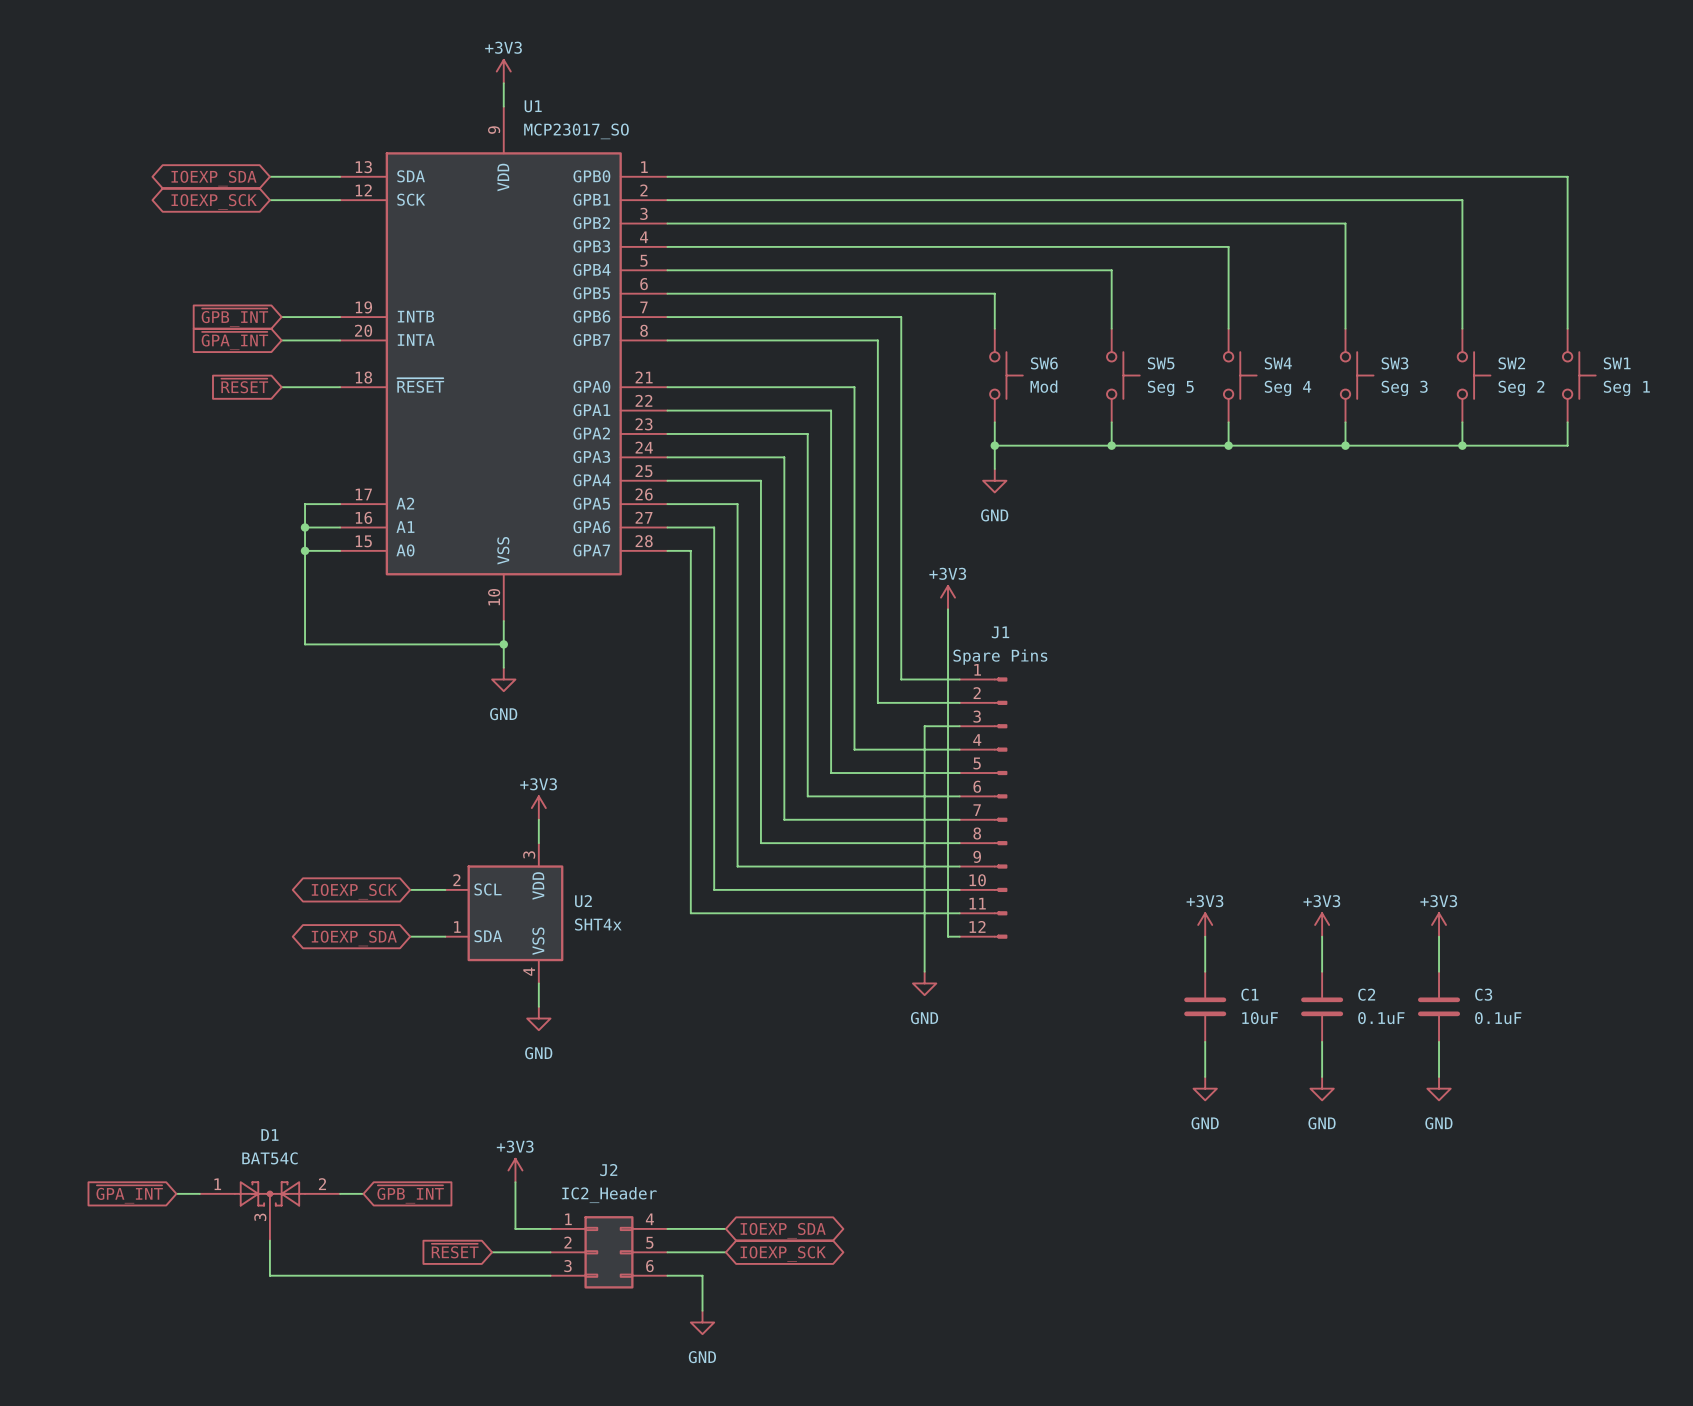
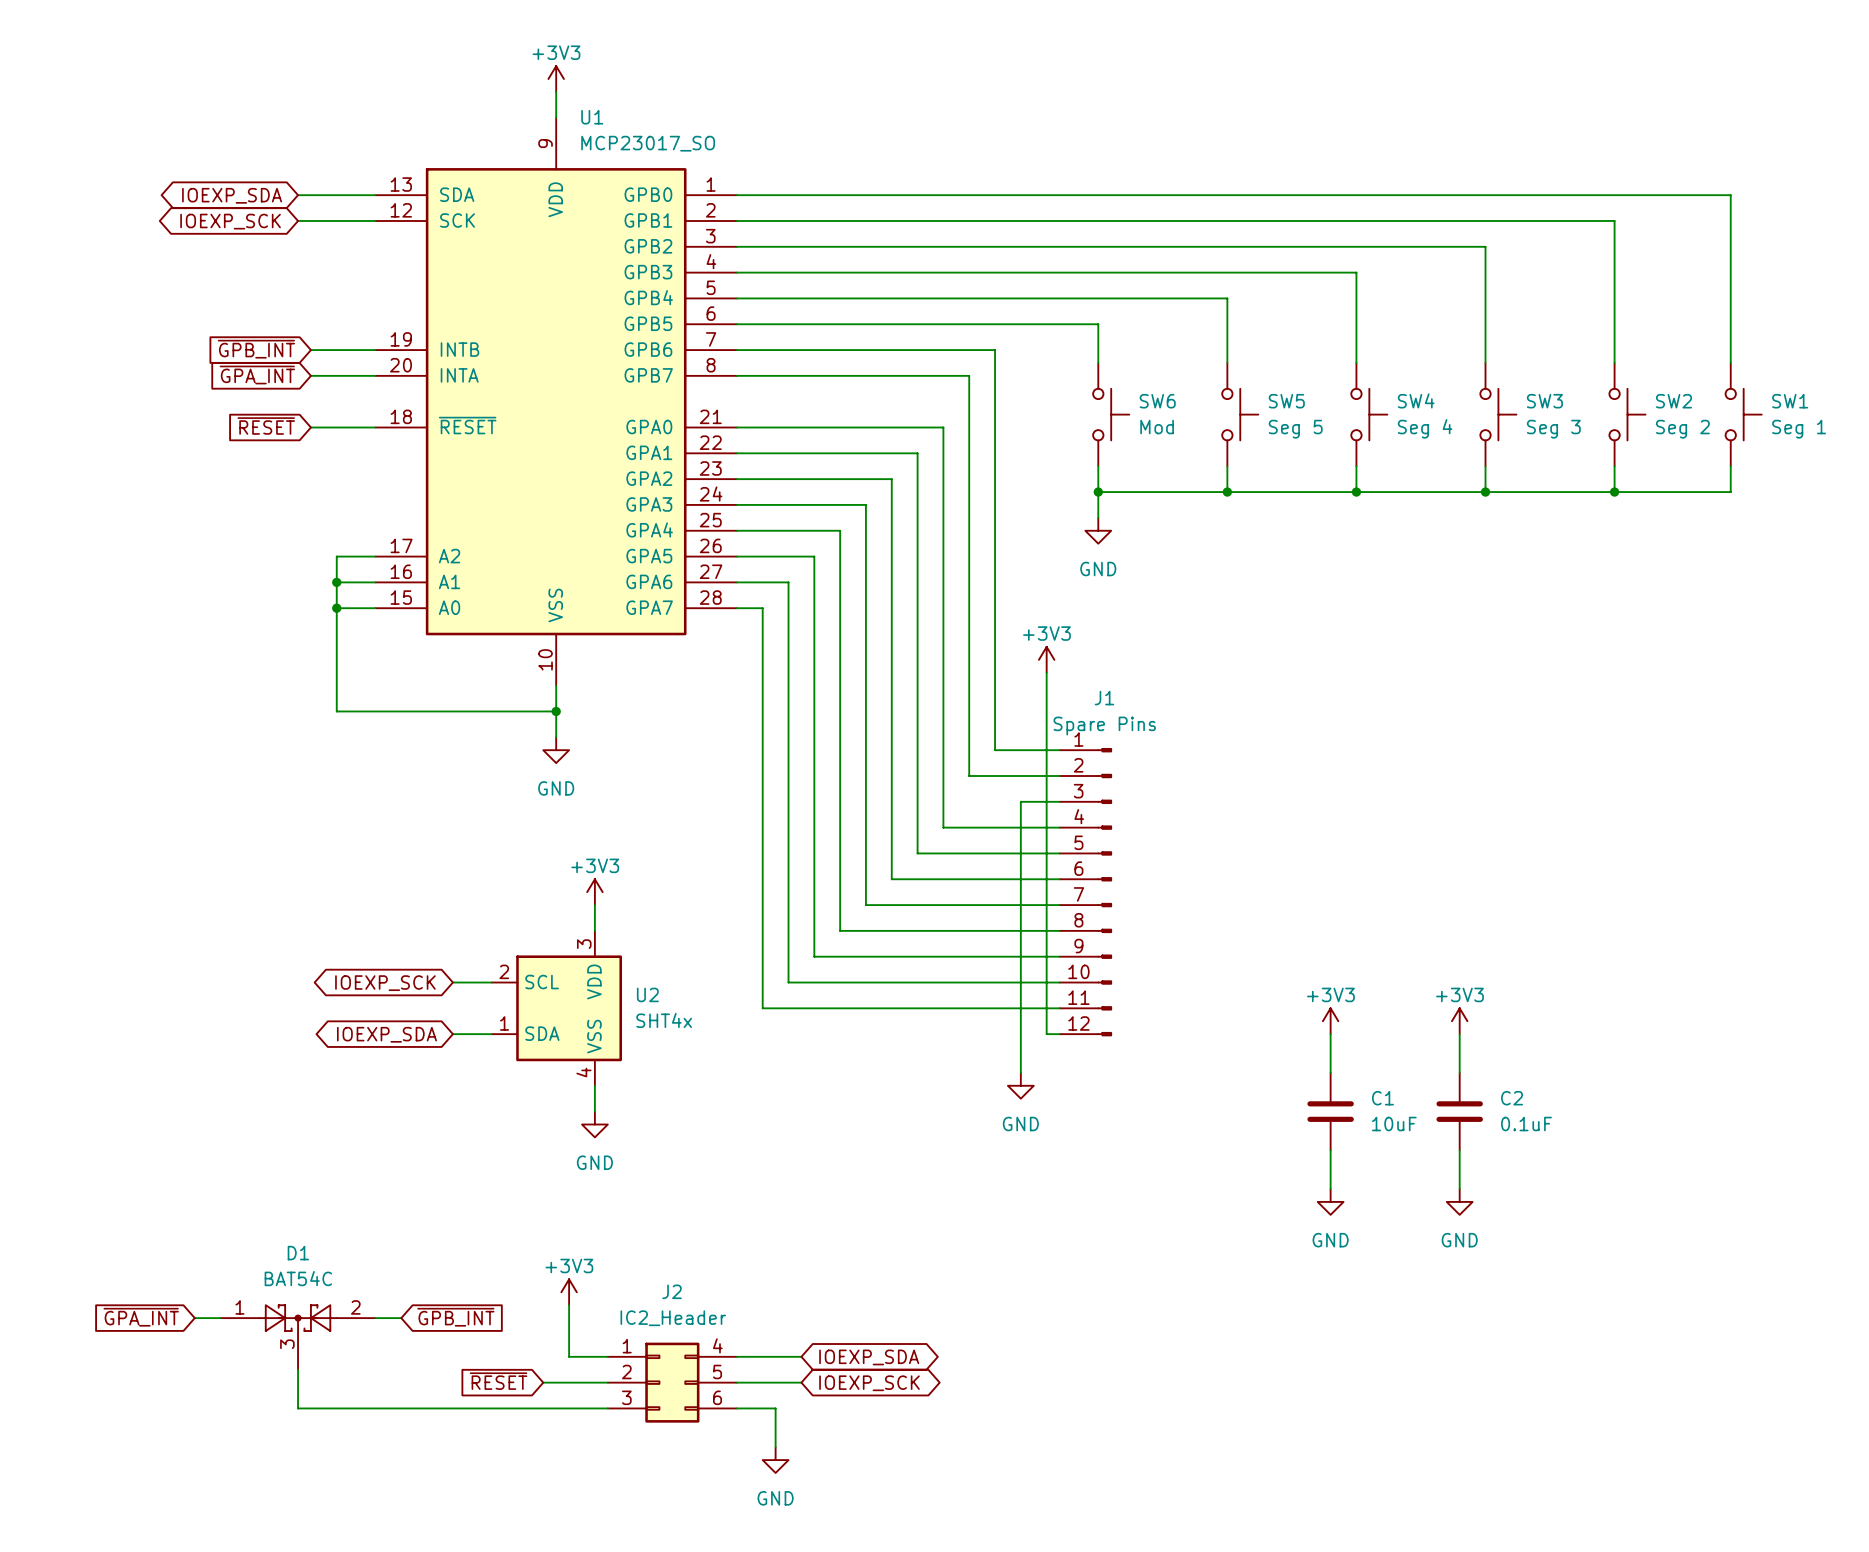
power symbol: +3V3 (1439, 924) -> none
wire: (1439, 936) (1439, 971) -> none
C3: 0.1uF (1439, 1006) -> none
wire: (1439, 1041) (1439, 1076) -> none
power symbol: GND (1439, 1088) -> none

